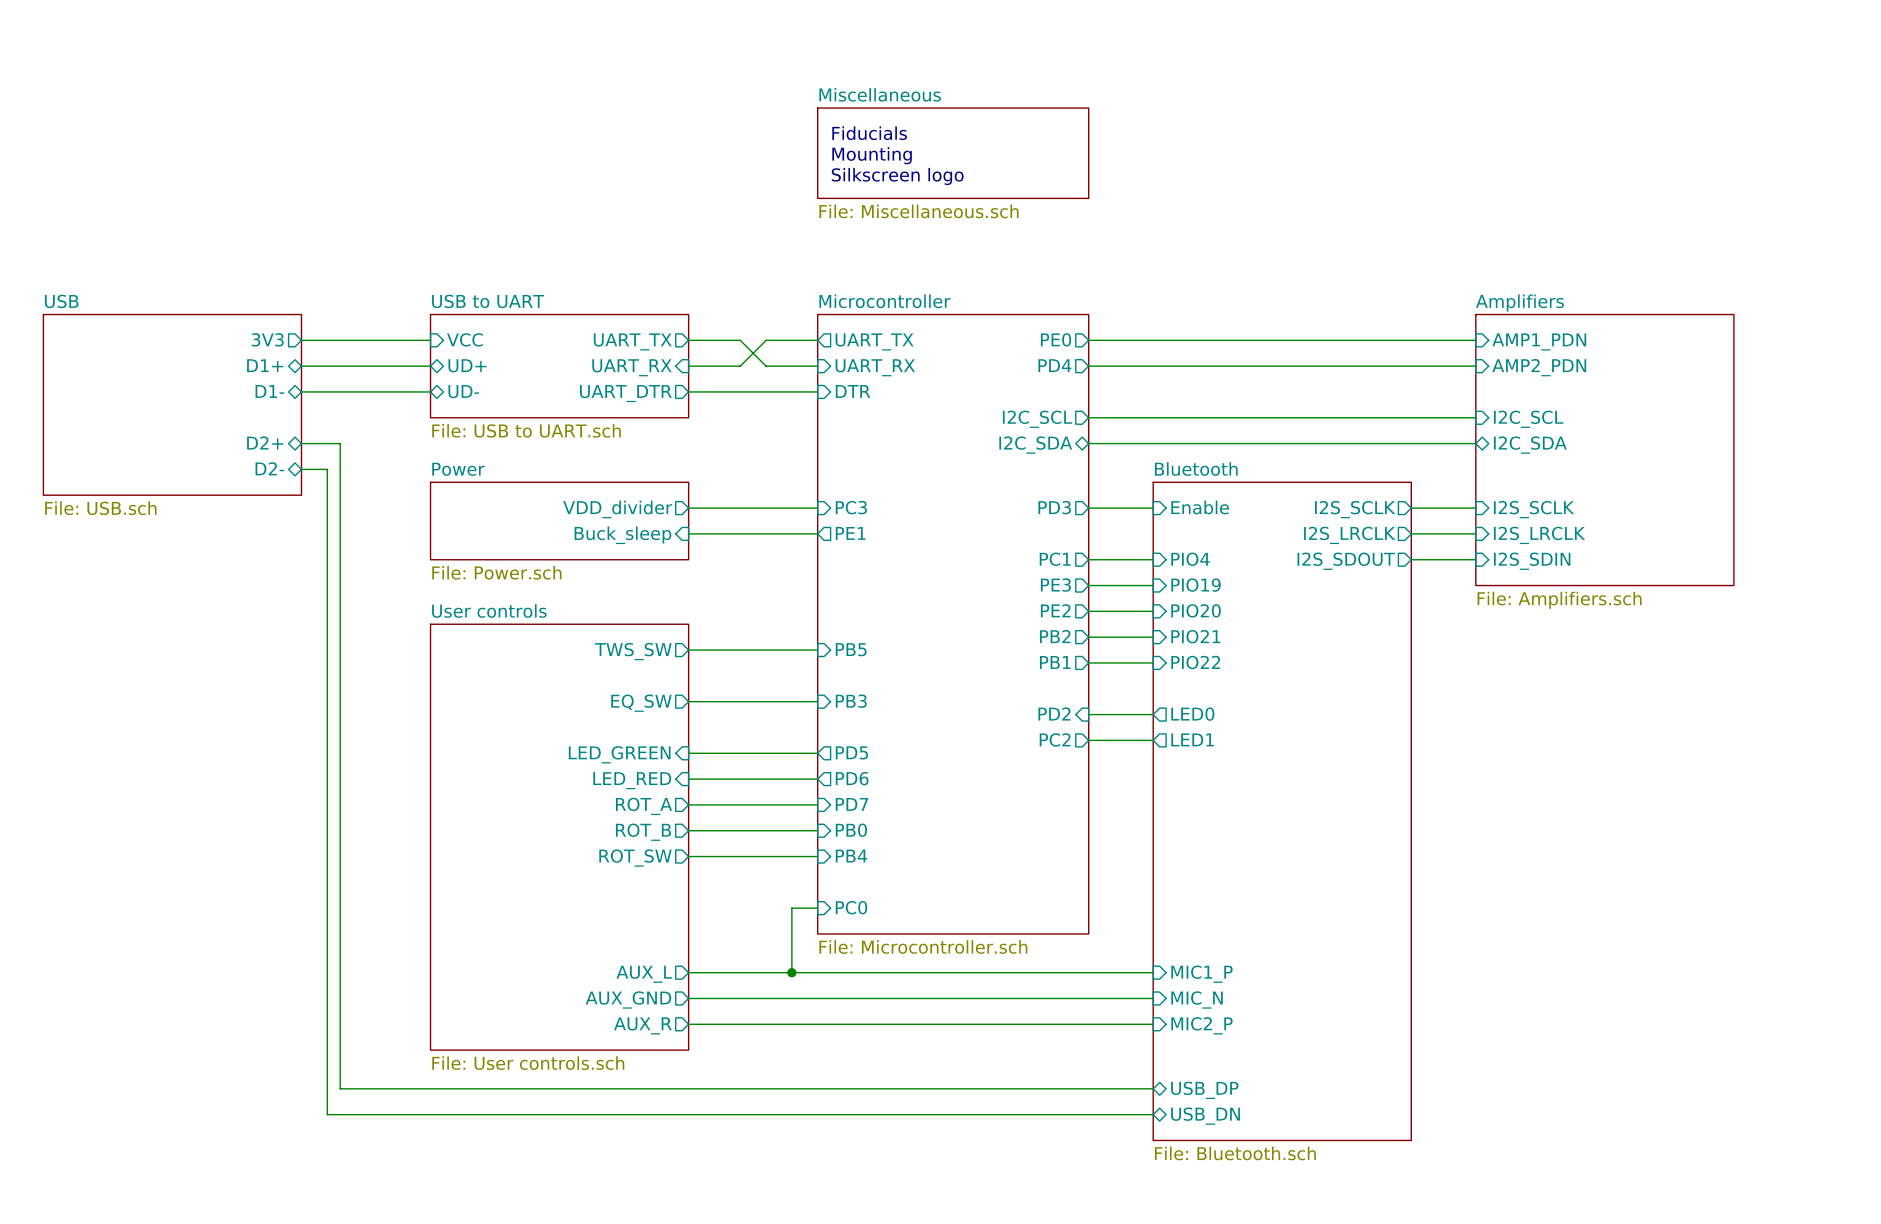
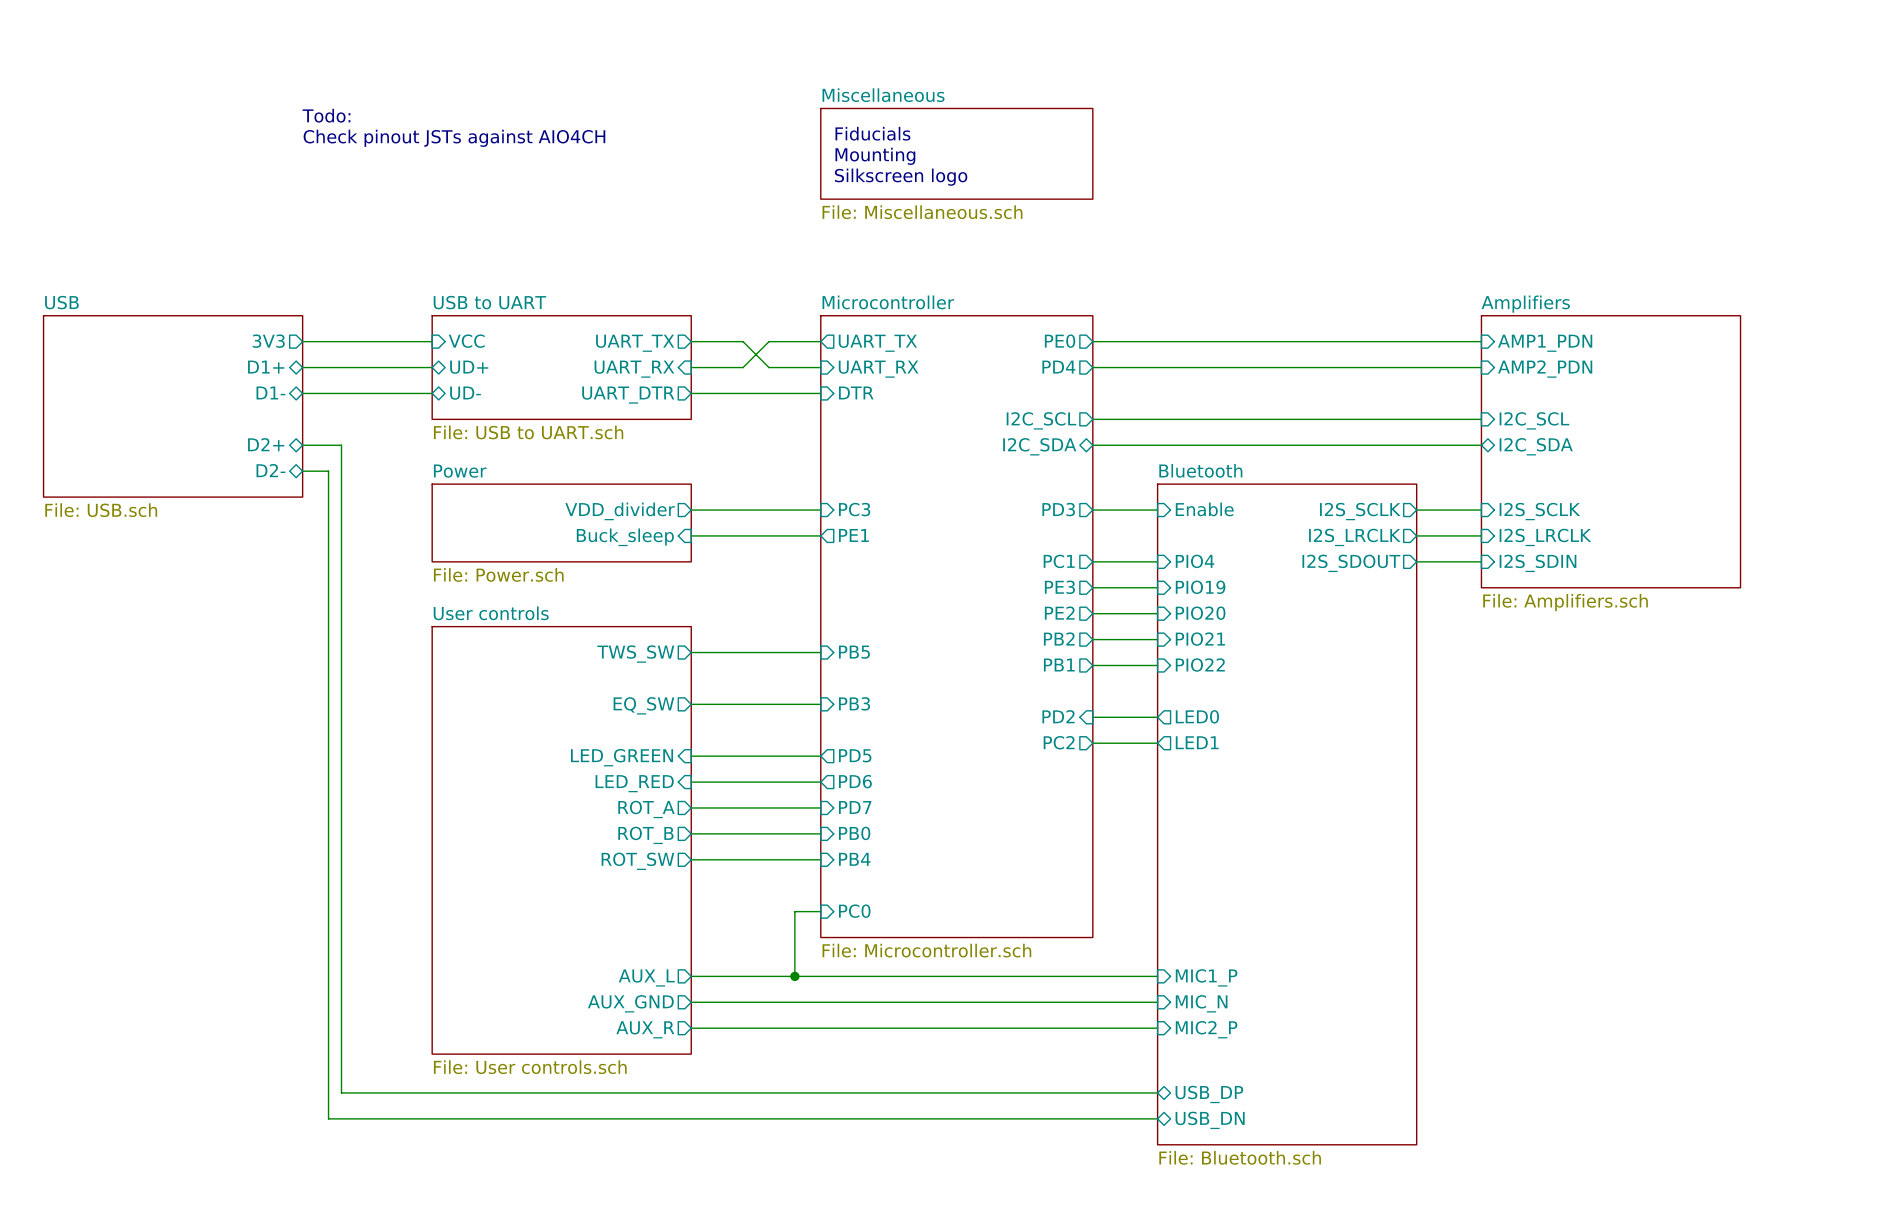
text: none -> Todo: (326, 115)
text: none -> Check pinout JSTs against AIO4CH (454, 138)

